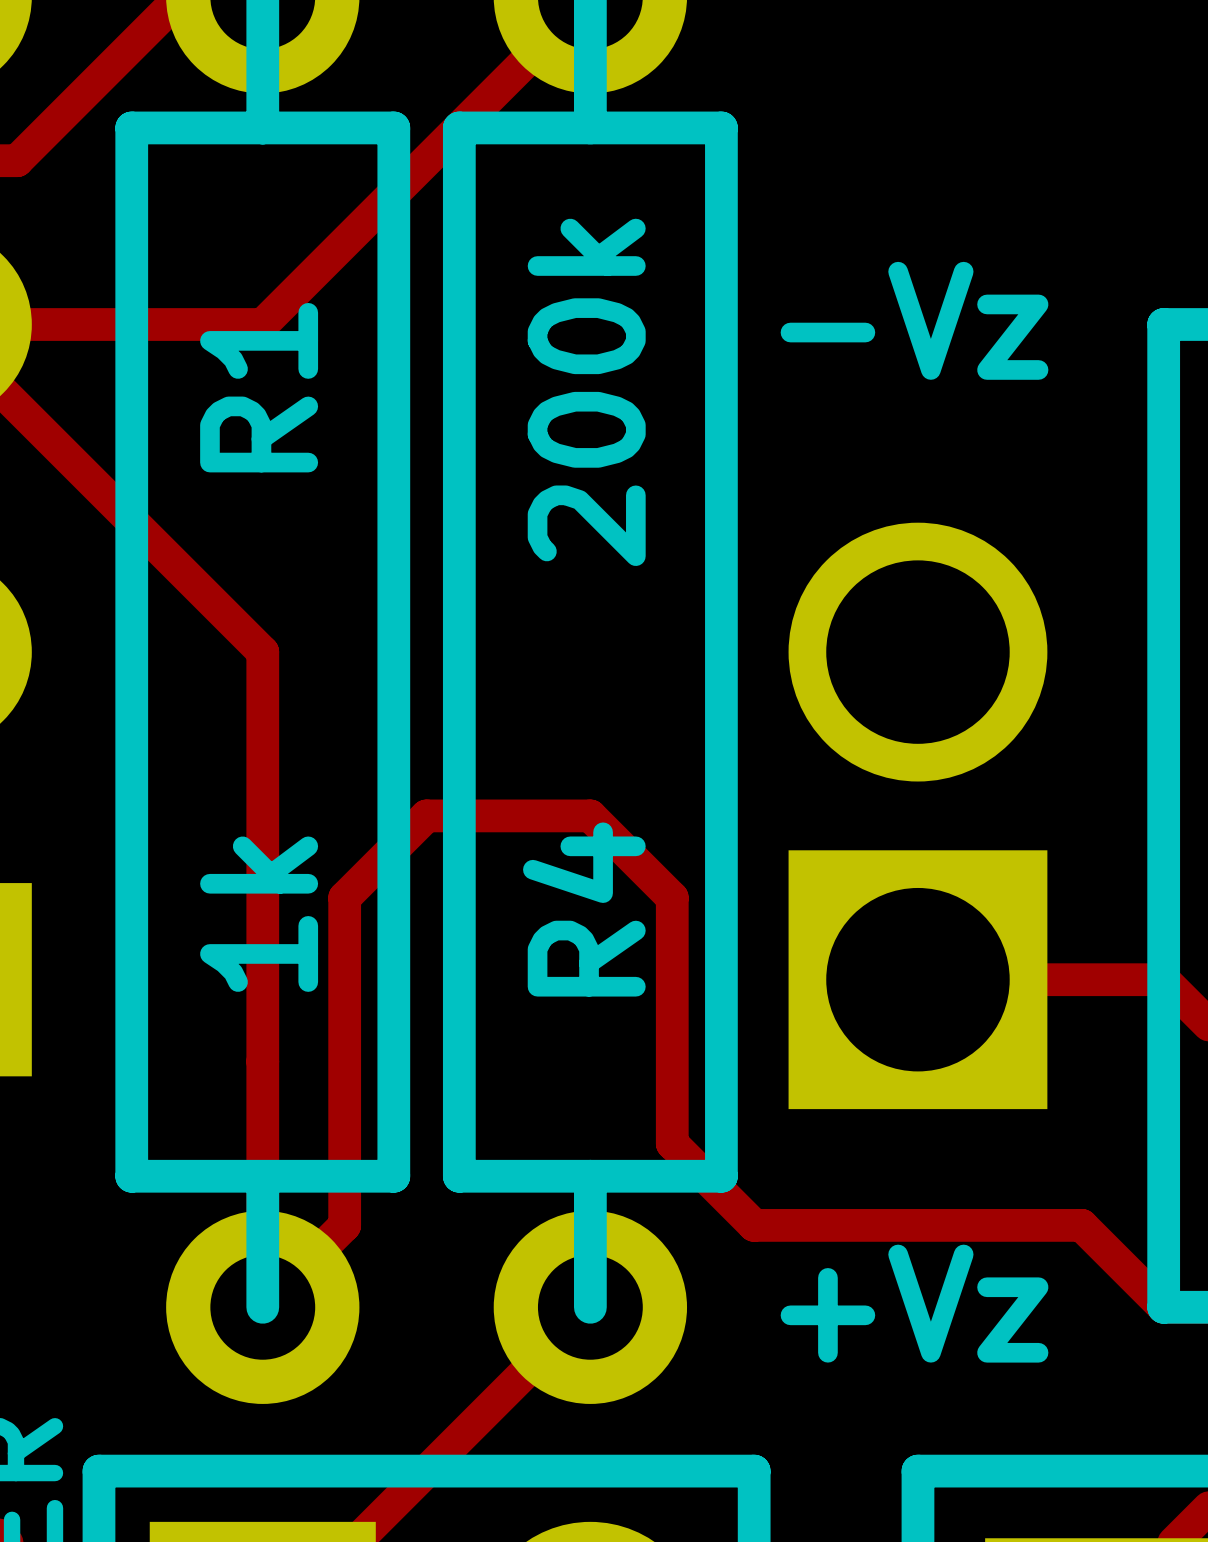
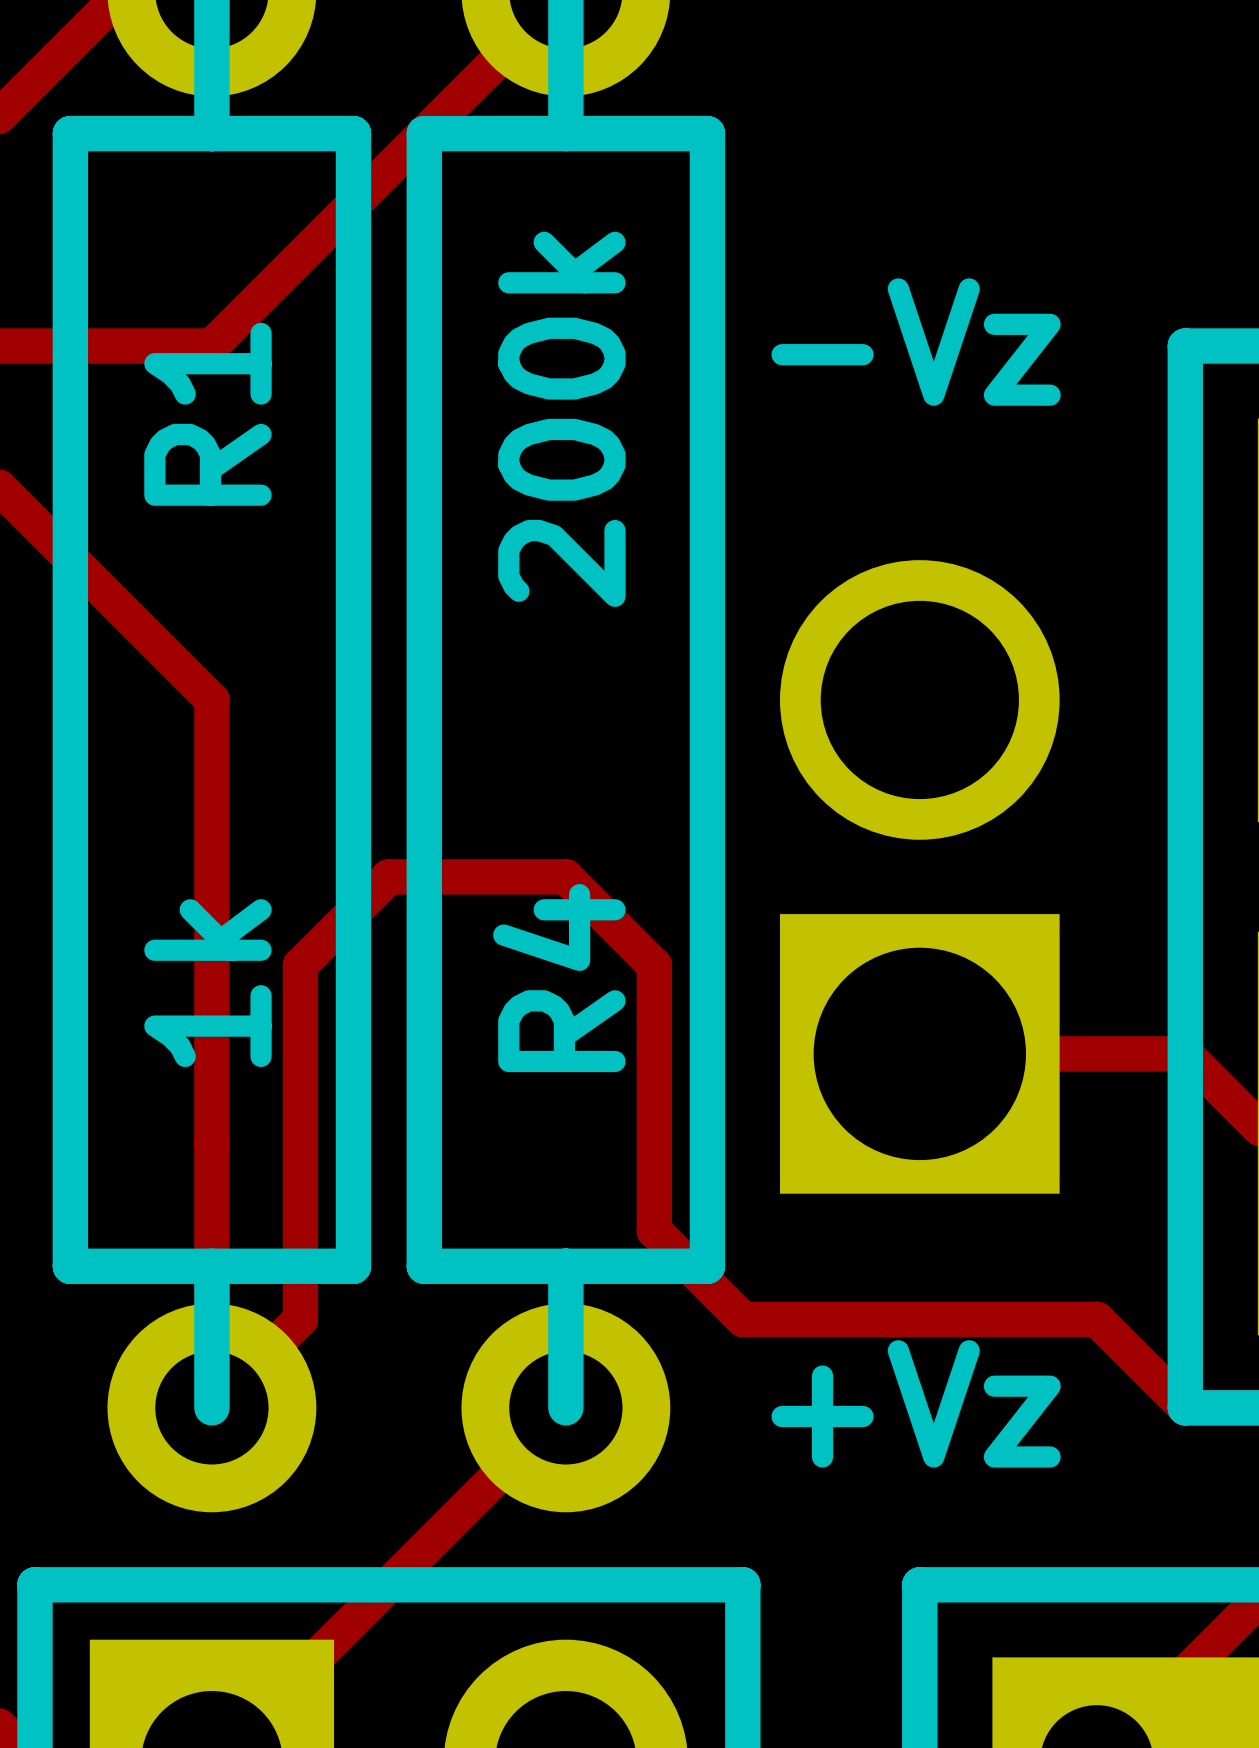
part footprint: [788, 850, 1048, 1110] -> [780, 914, 1060, 1194]

